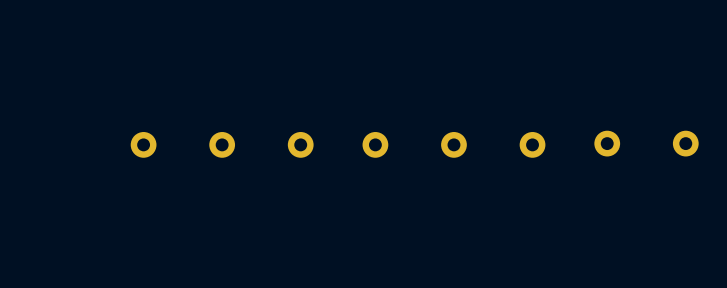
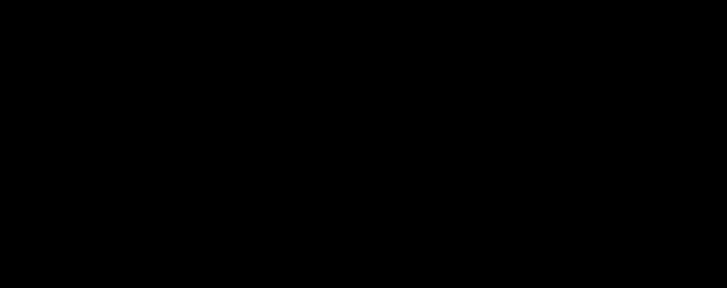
part: (607, 143) -> none
part: (685, 143) -> none
part: (143, 144) -> none
part: (222, 144) -> none
part: (300, 144) -> none
part: (375, 144) -> none
part: (453, 144) -> none
part: (532, 144) -> none

